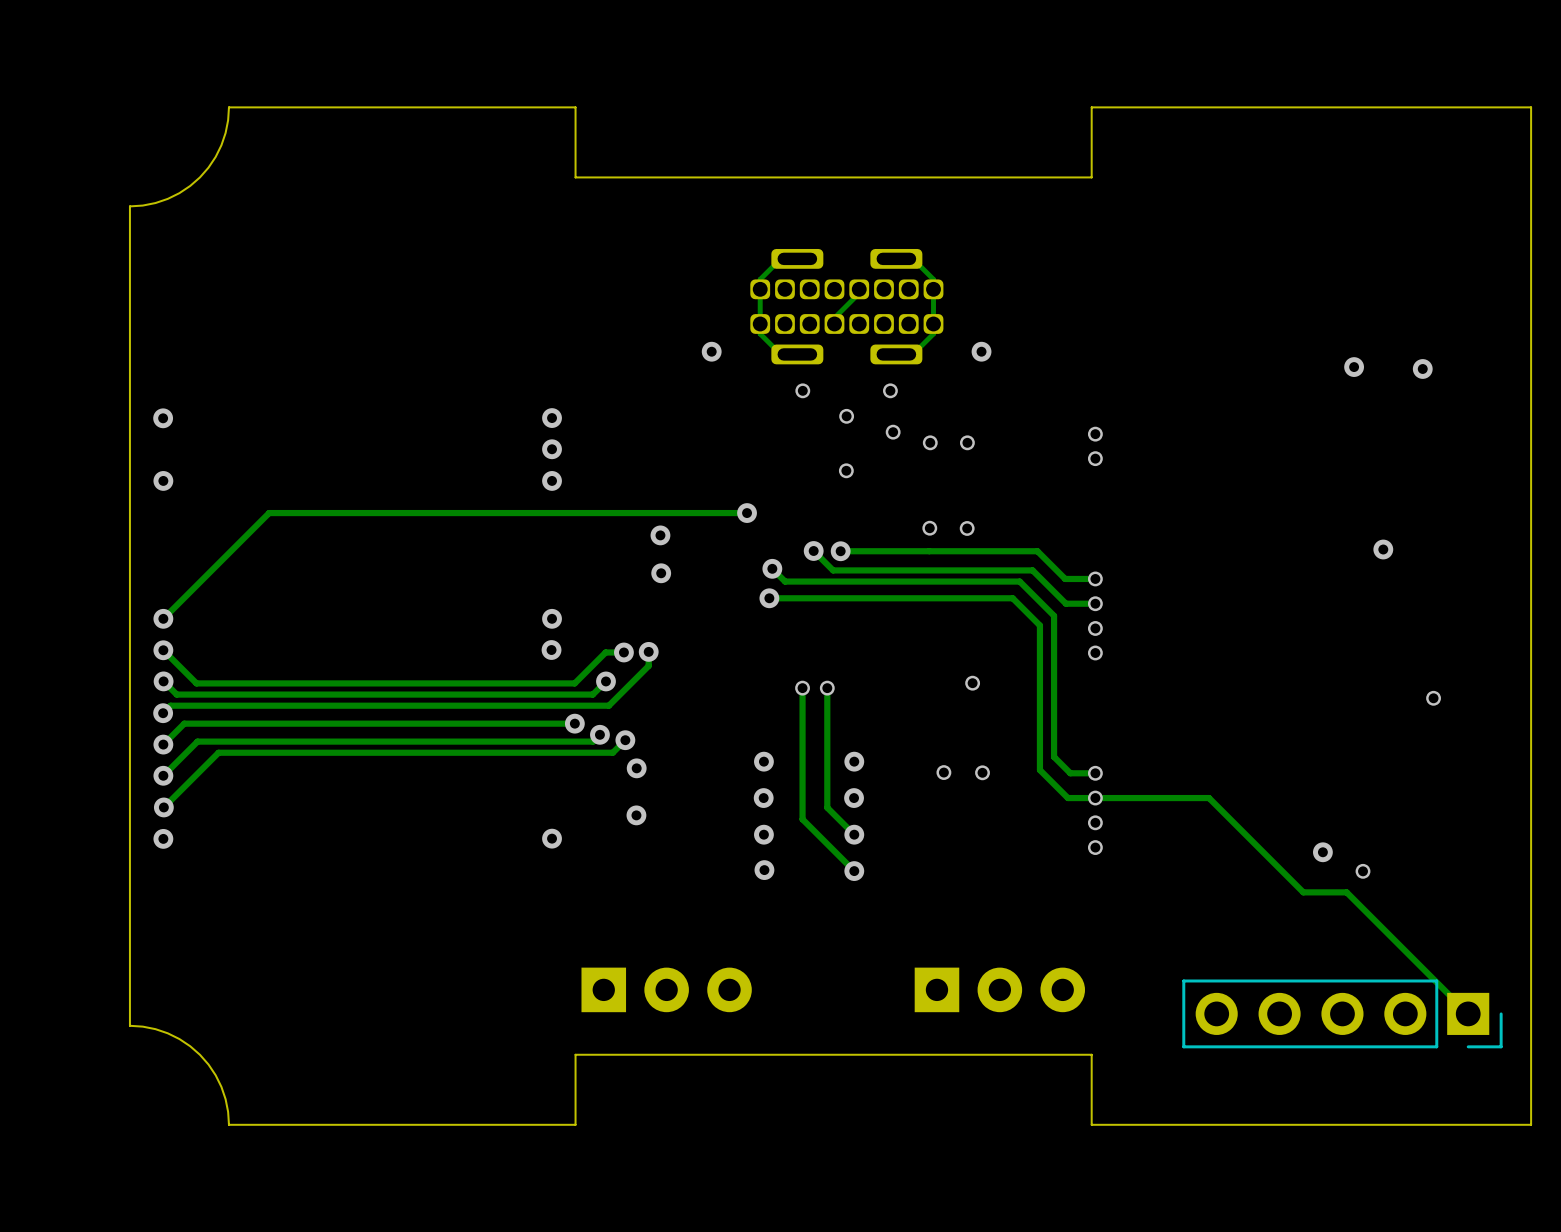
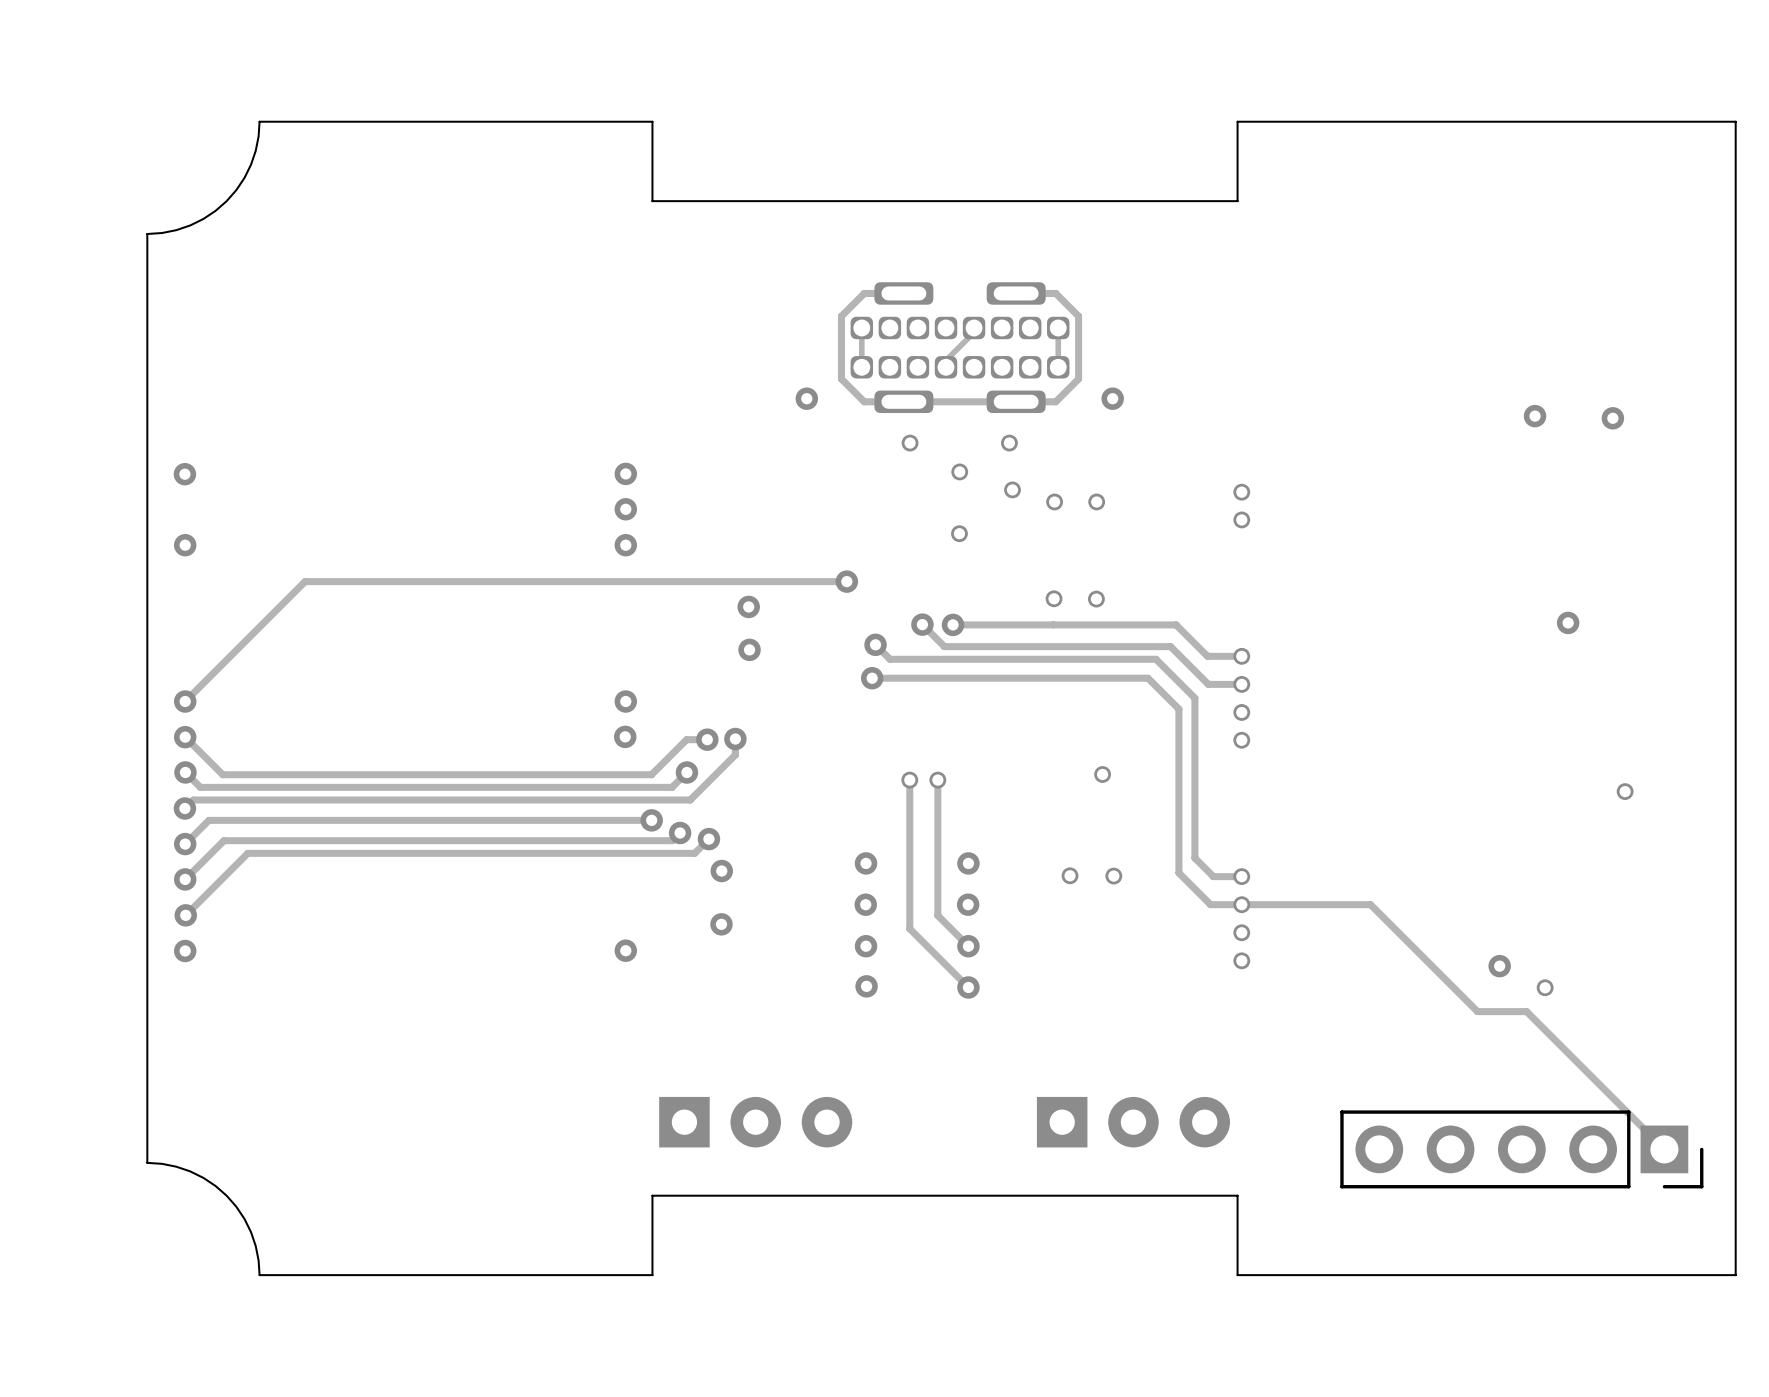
track: (780, 258) (760, 279) (760, 289) -> (885, 293) (864, 293) (841, 316) (841, 378) (864, 401) (885, 401)
track: (912, 258) (933, 279) (933, 289) -> (1034, 293) (1055, 293) (1078, 316) (1078, 378) (1055, 401) (1034, 401)
track: (760, 323) (760, 333) (780, 354) -> none
track: (933, 323) (933, 333) (912, 354) -> none
track: none -> (1016, 401) (903, 401)

